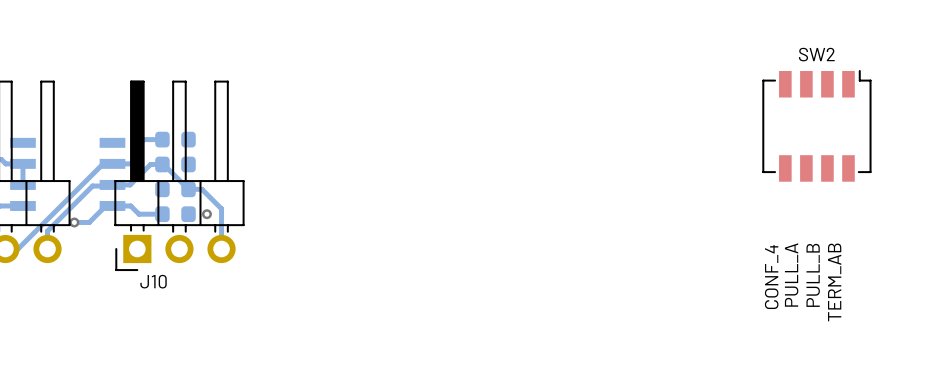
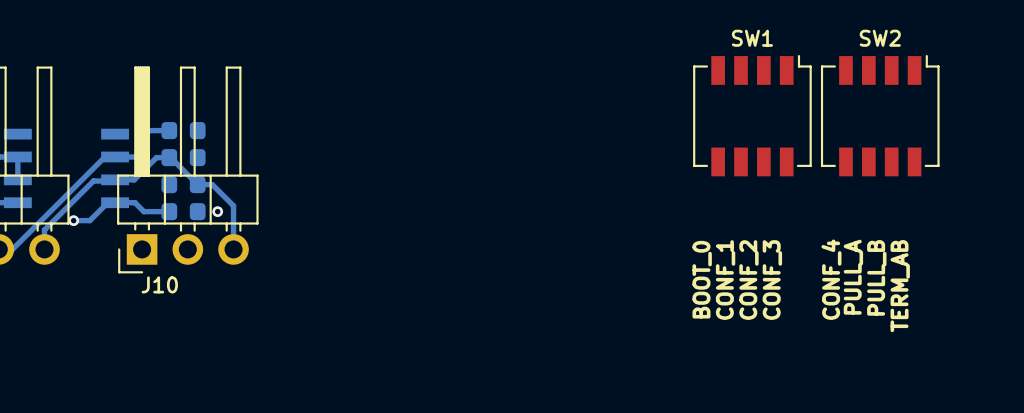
SW1: none -> (752, 115)
text: none -> BOOT_0 (702, 279)
text: none -> CONF_1 (725, 280)
text: none -> CONF_2 (748, 280)
text: none -> CONF_3 (772, 280)

